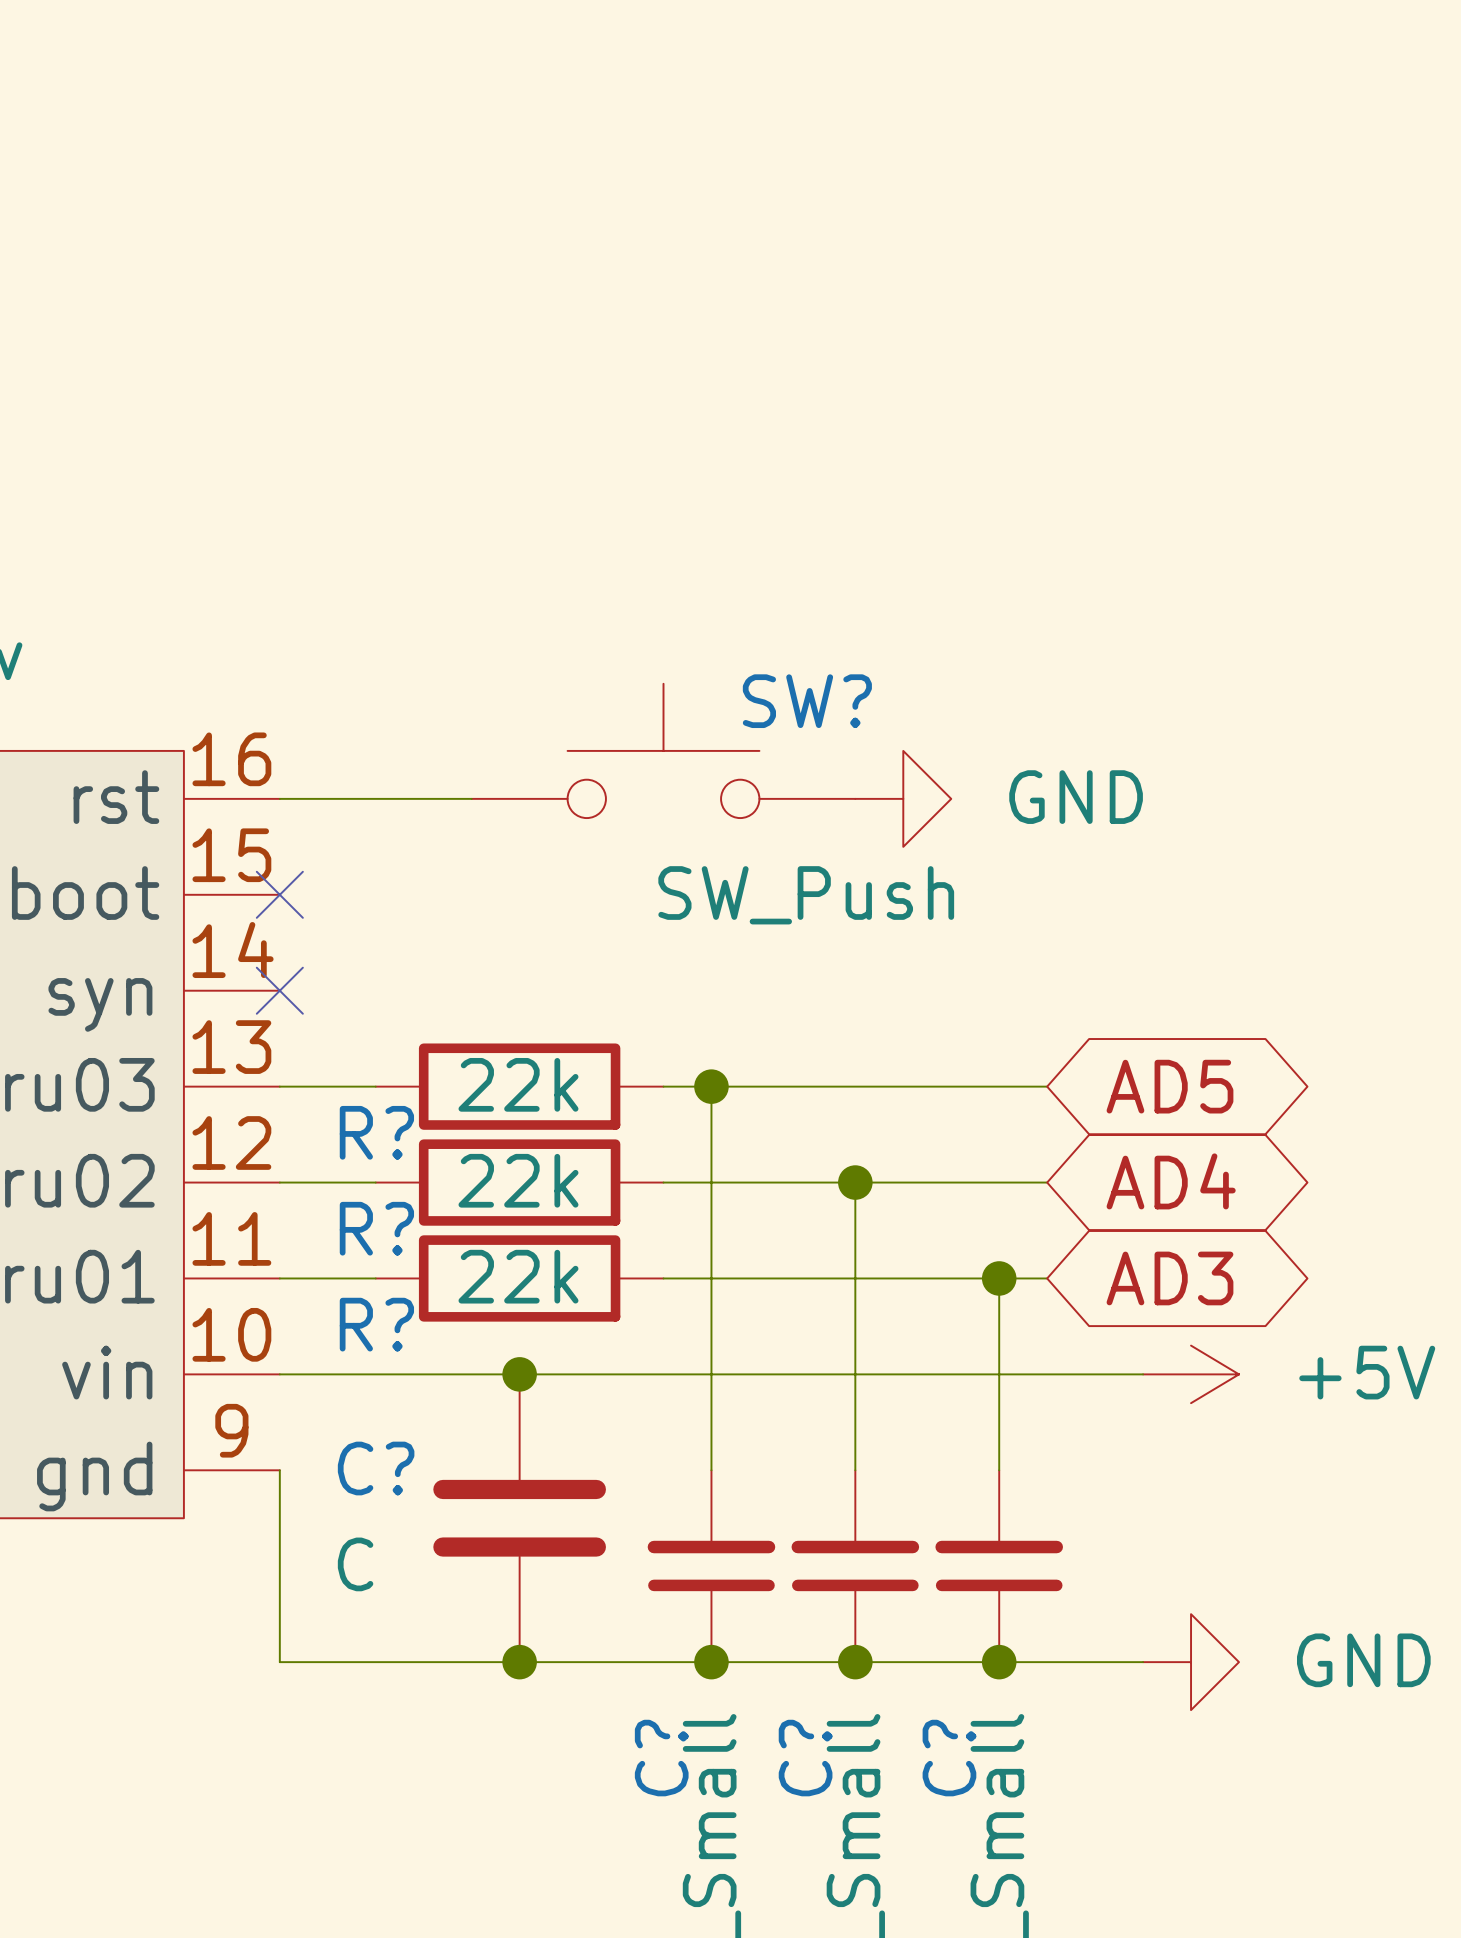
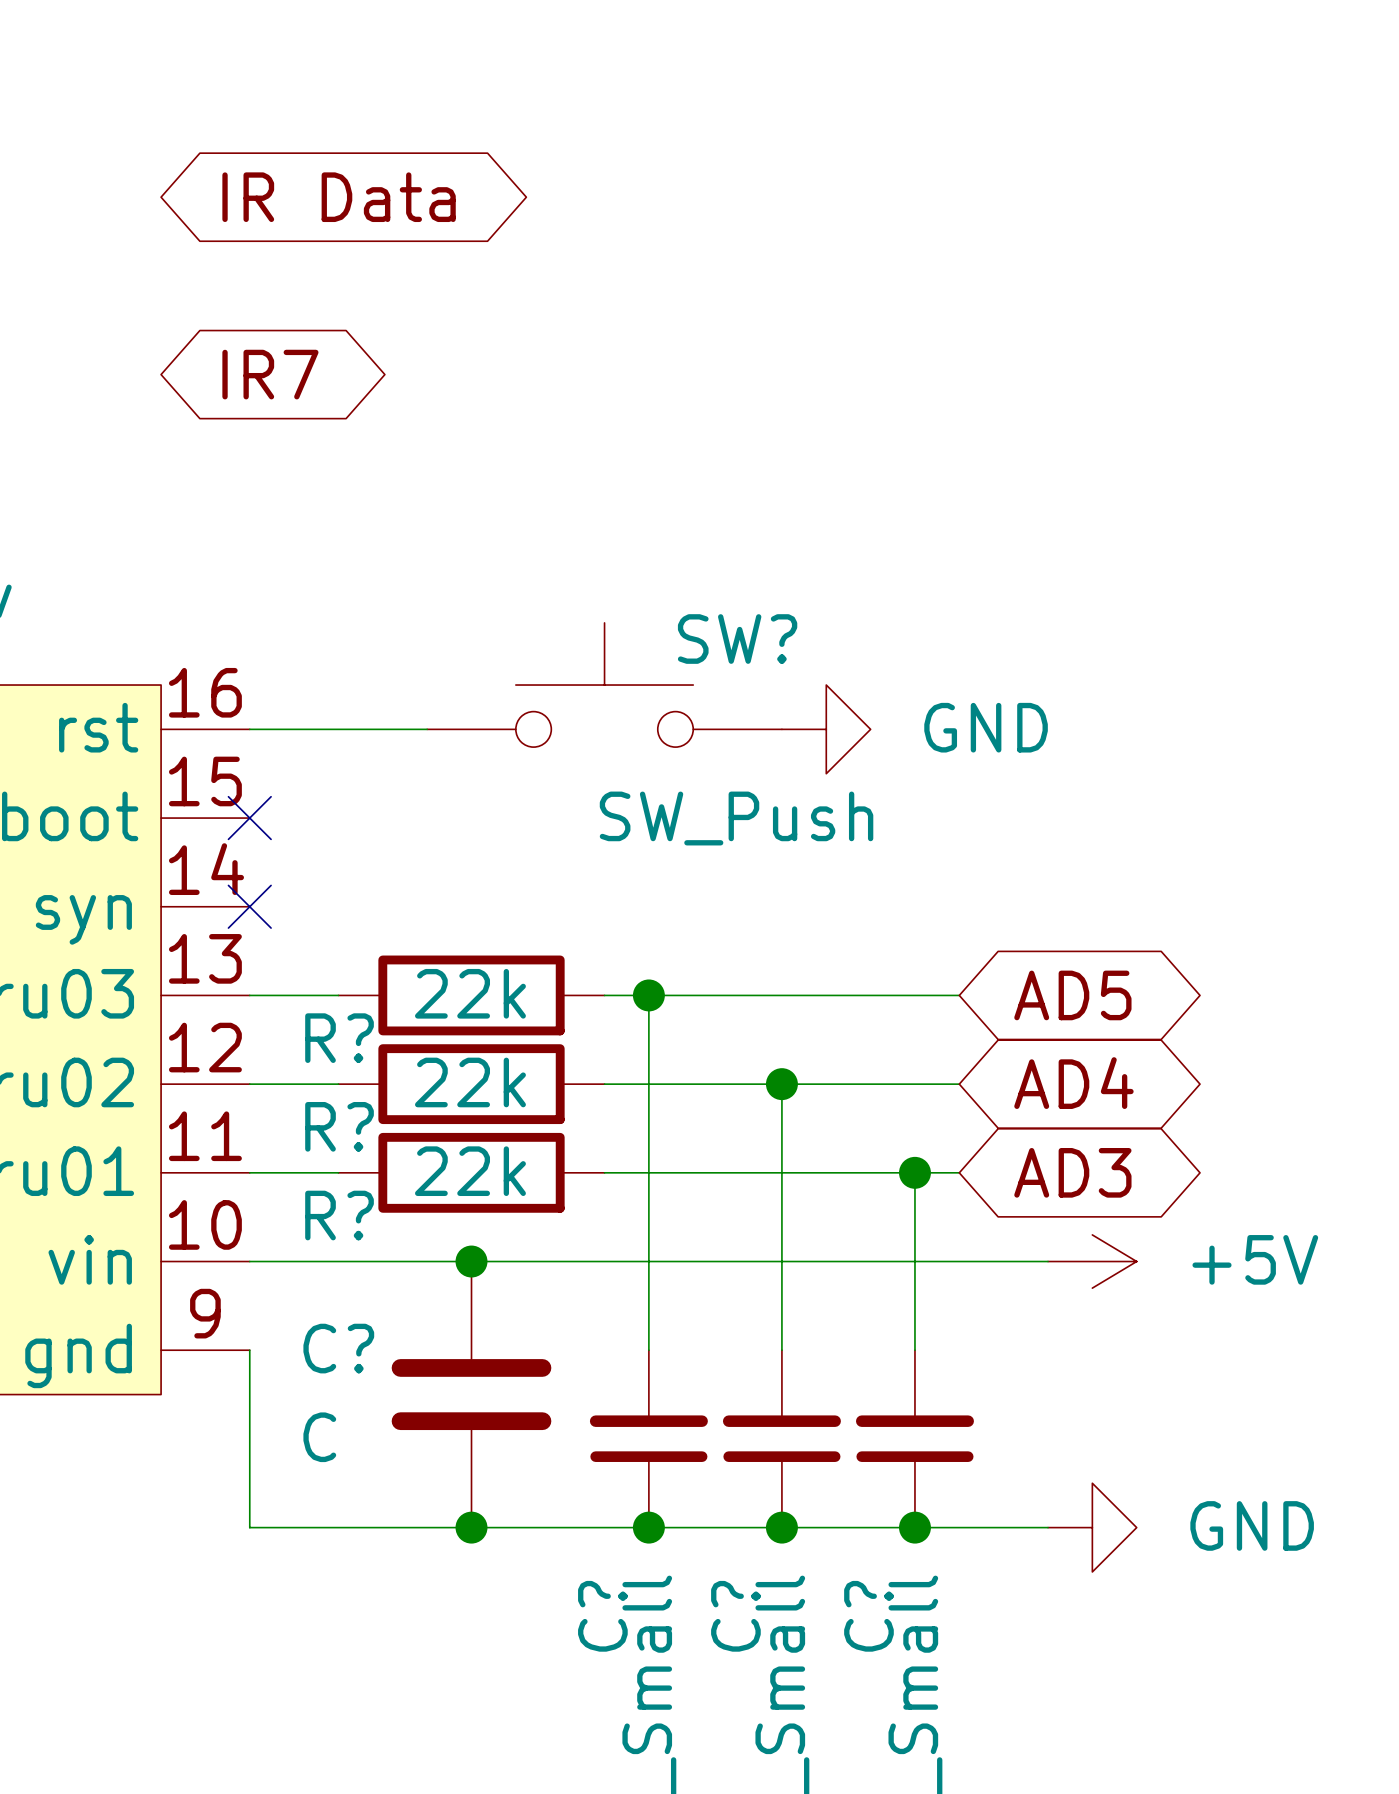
global label: none -> IR Data (339, 197)
global label: none -> IR7 (270, 374)

